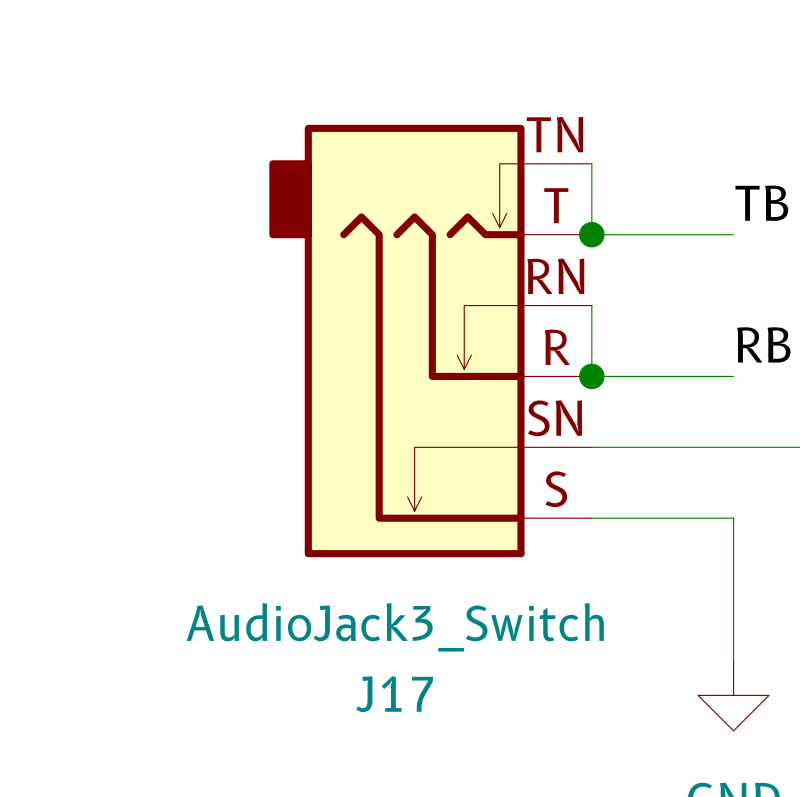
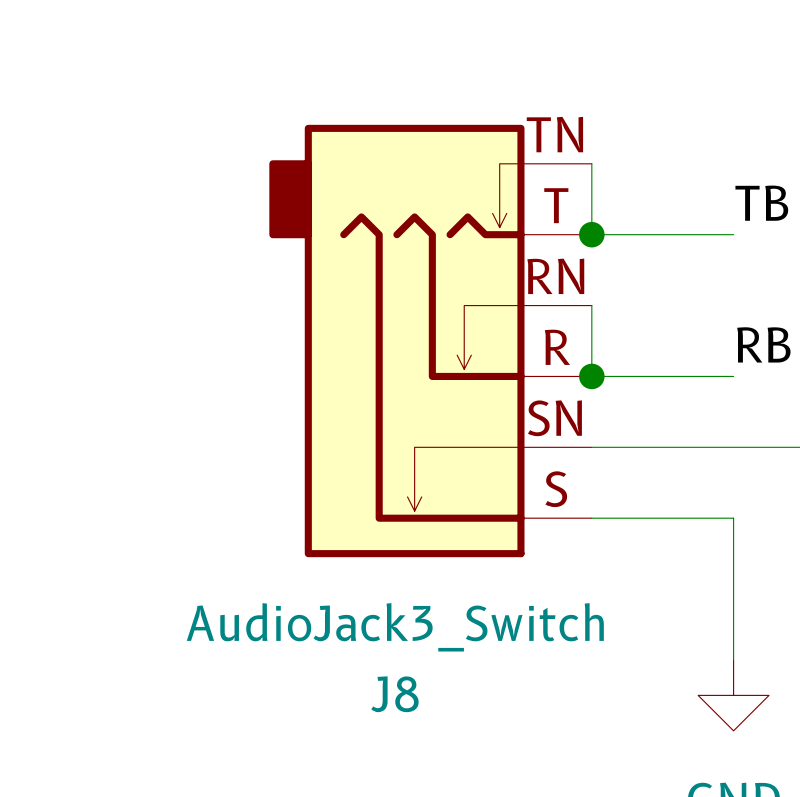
J17 name: J17 (394, 694) -> J8 (394, 694)

